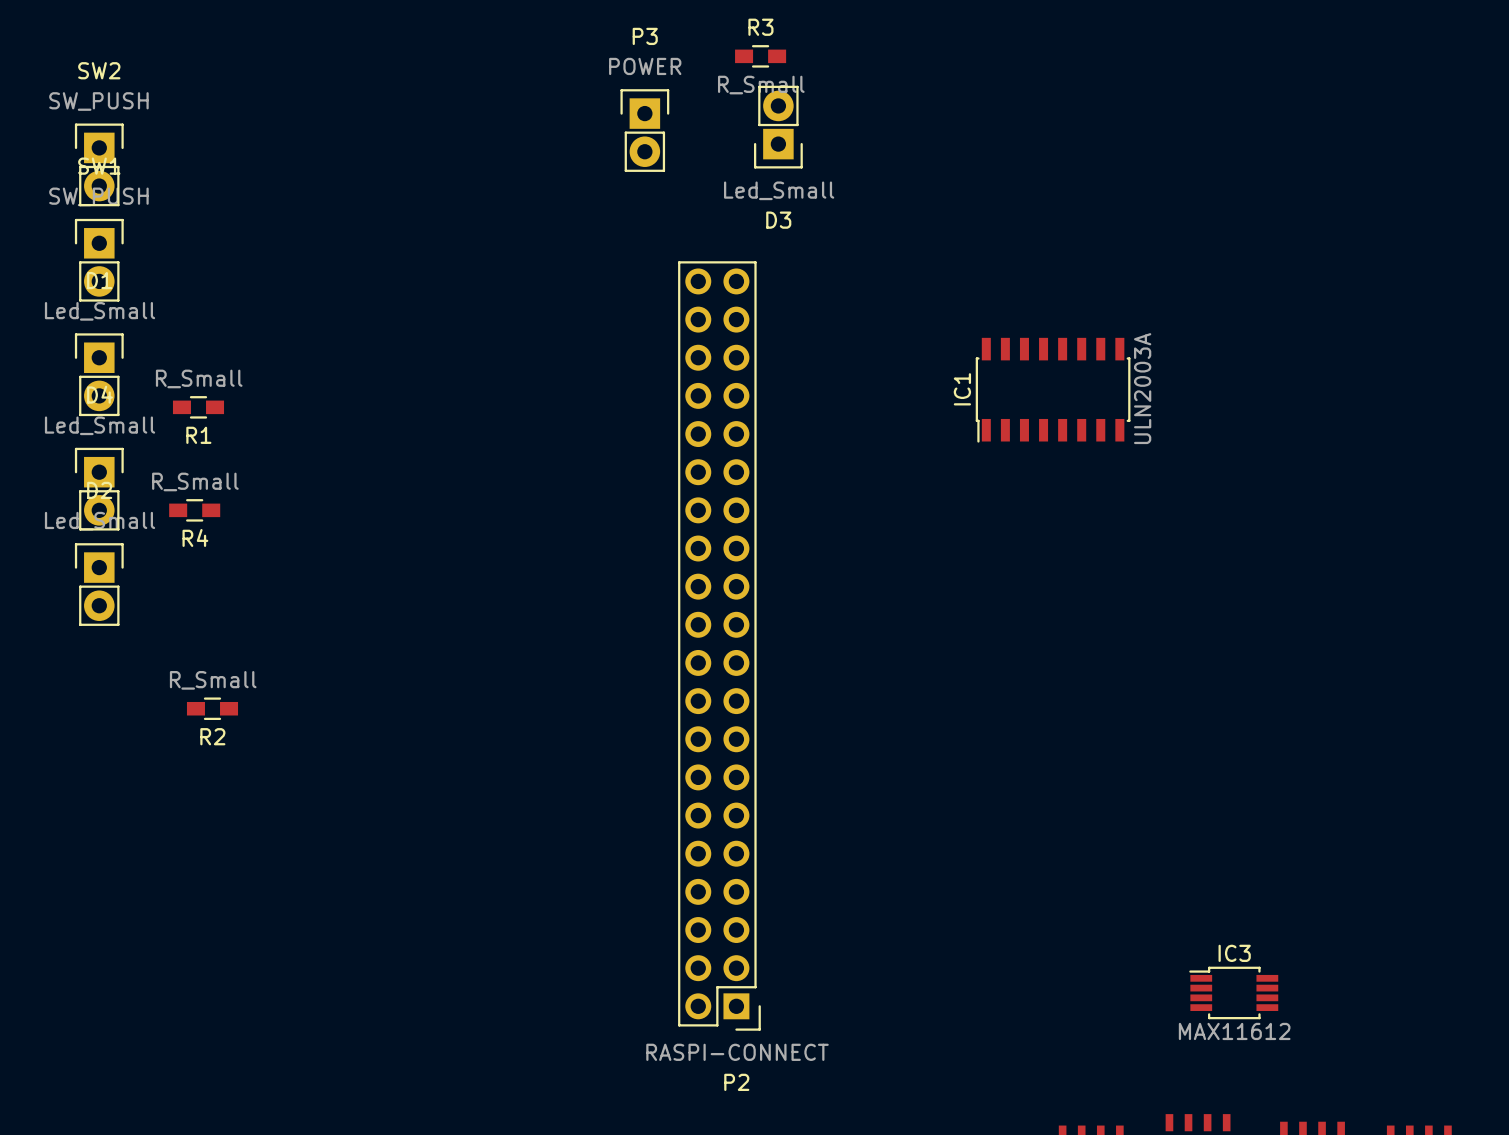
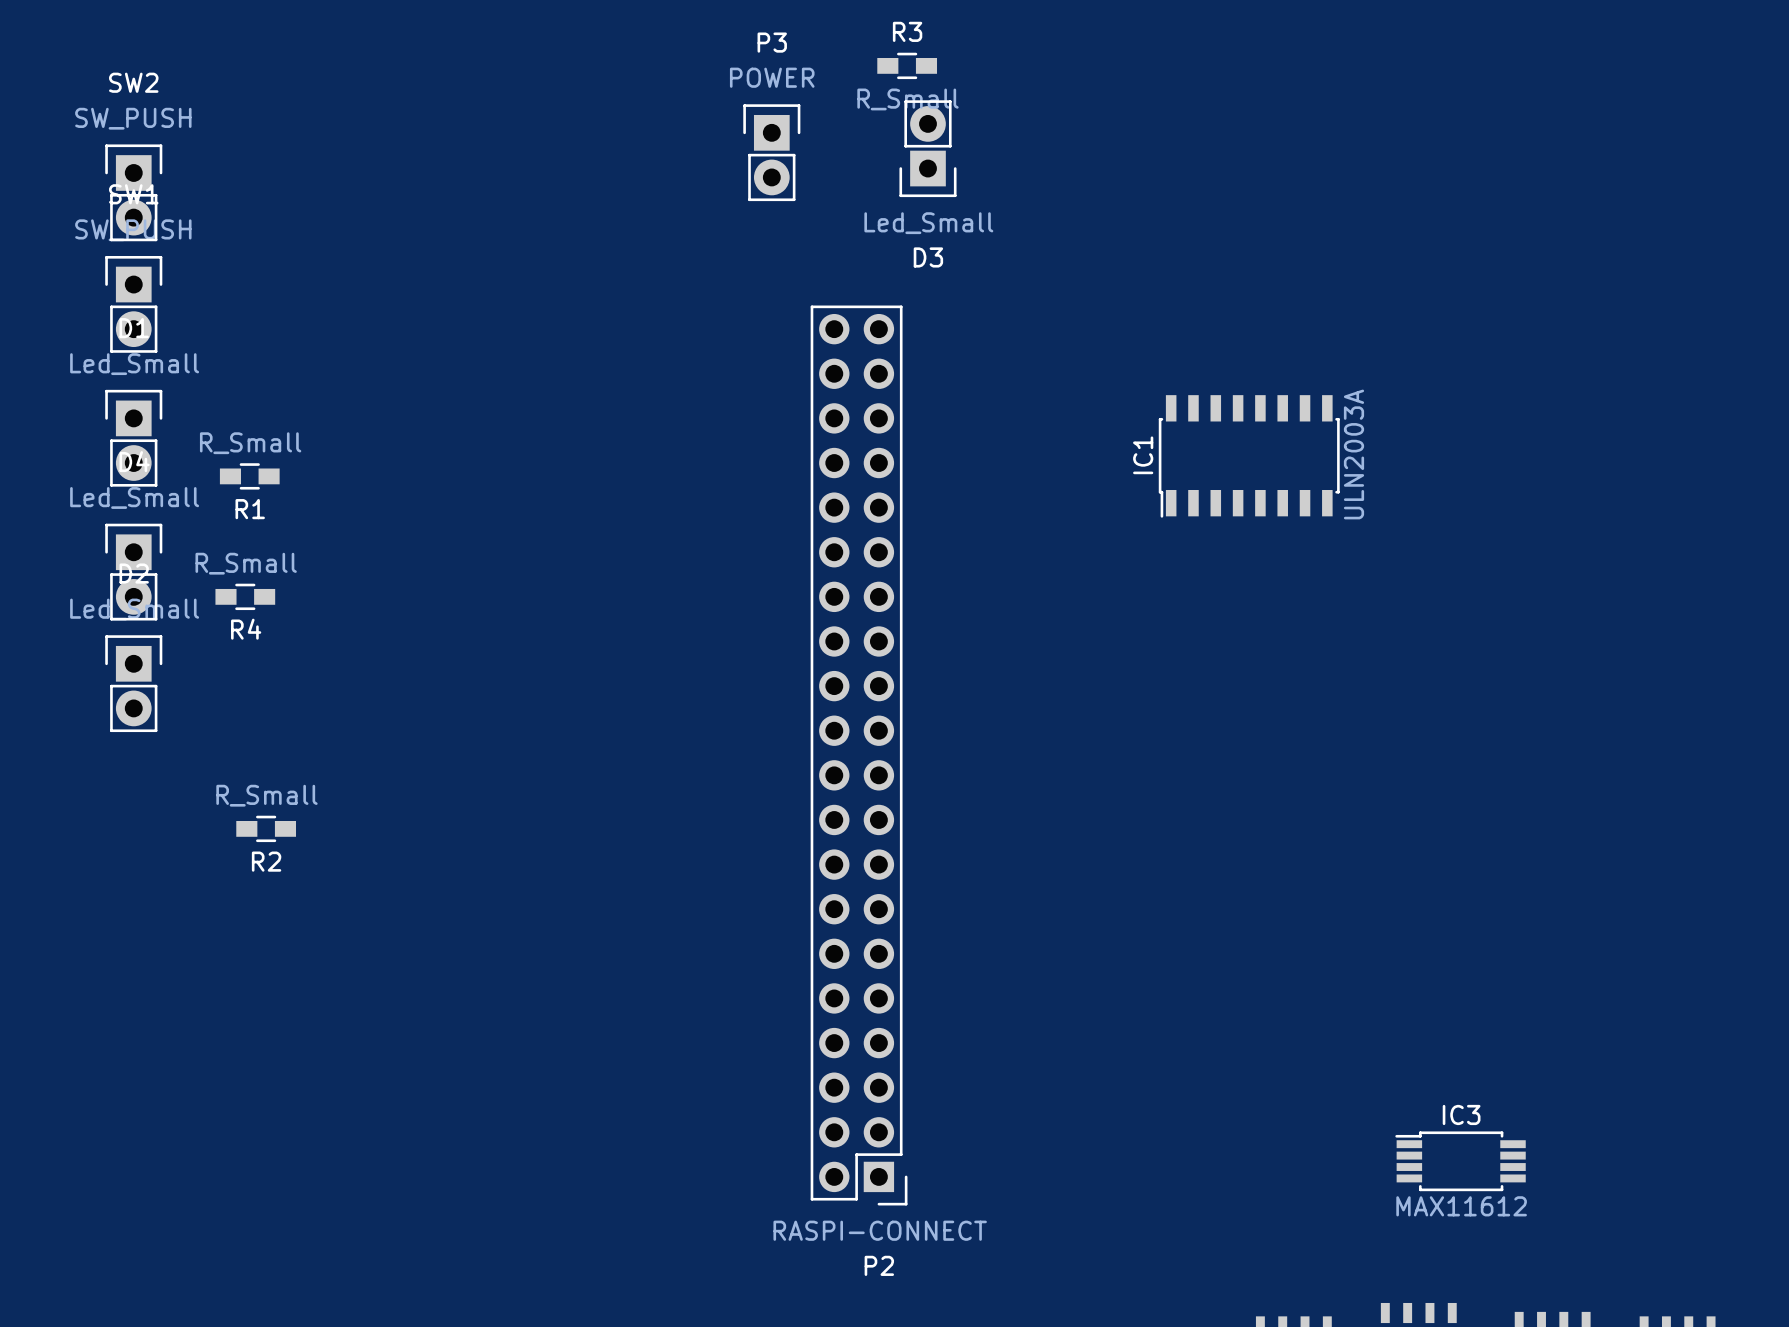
IC3 footprint: [1189, 966, 1279, 1020] -> [1395, 1131, 1526, 1192]

